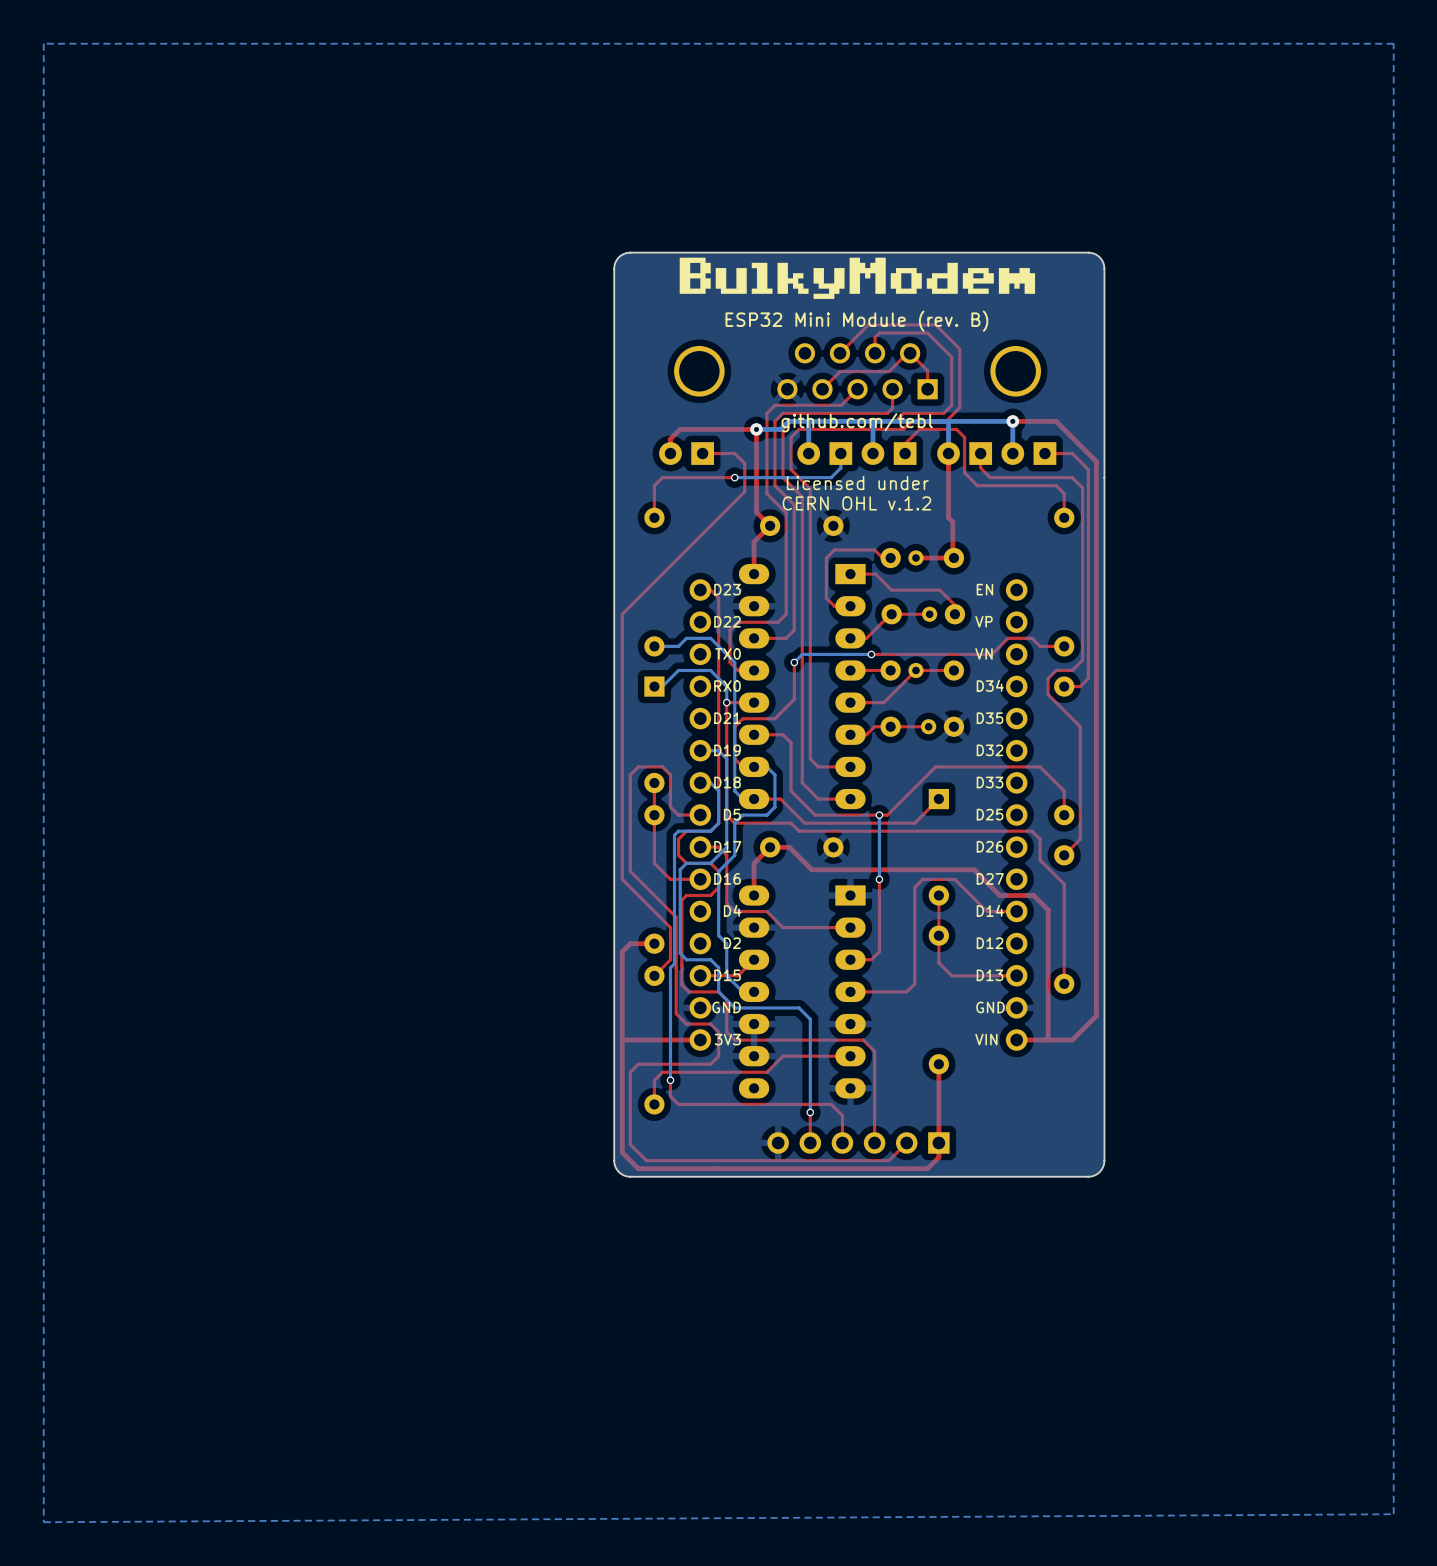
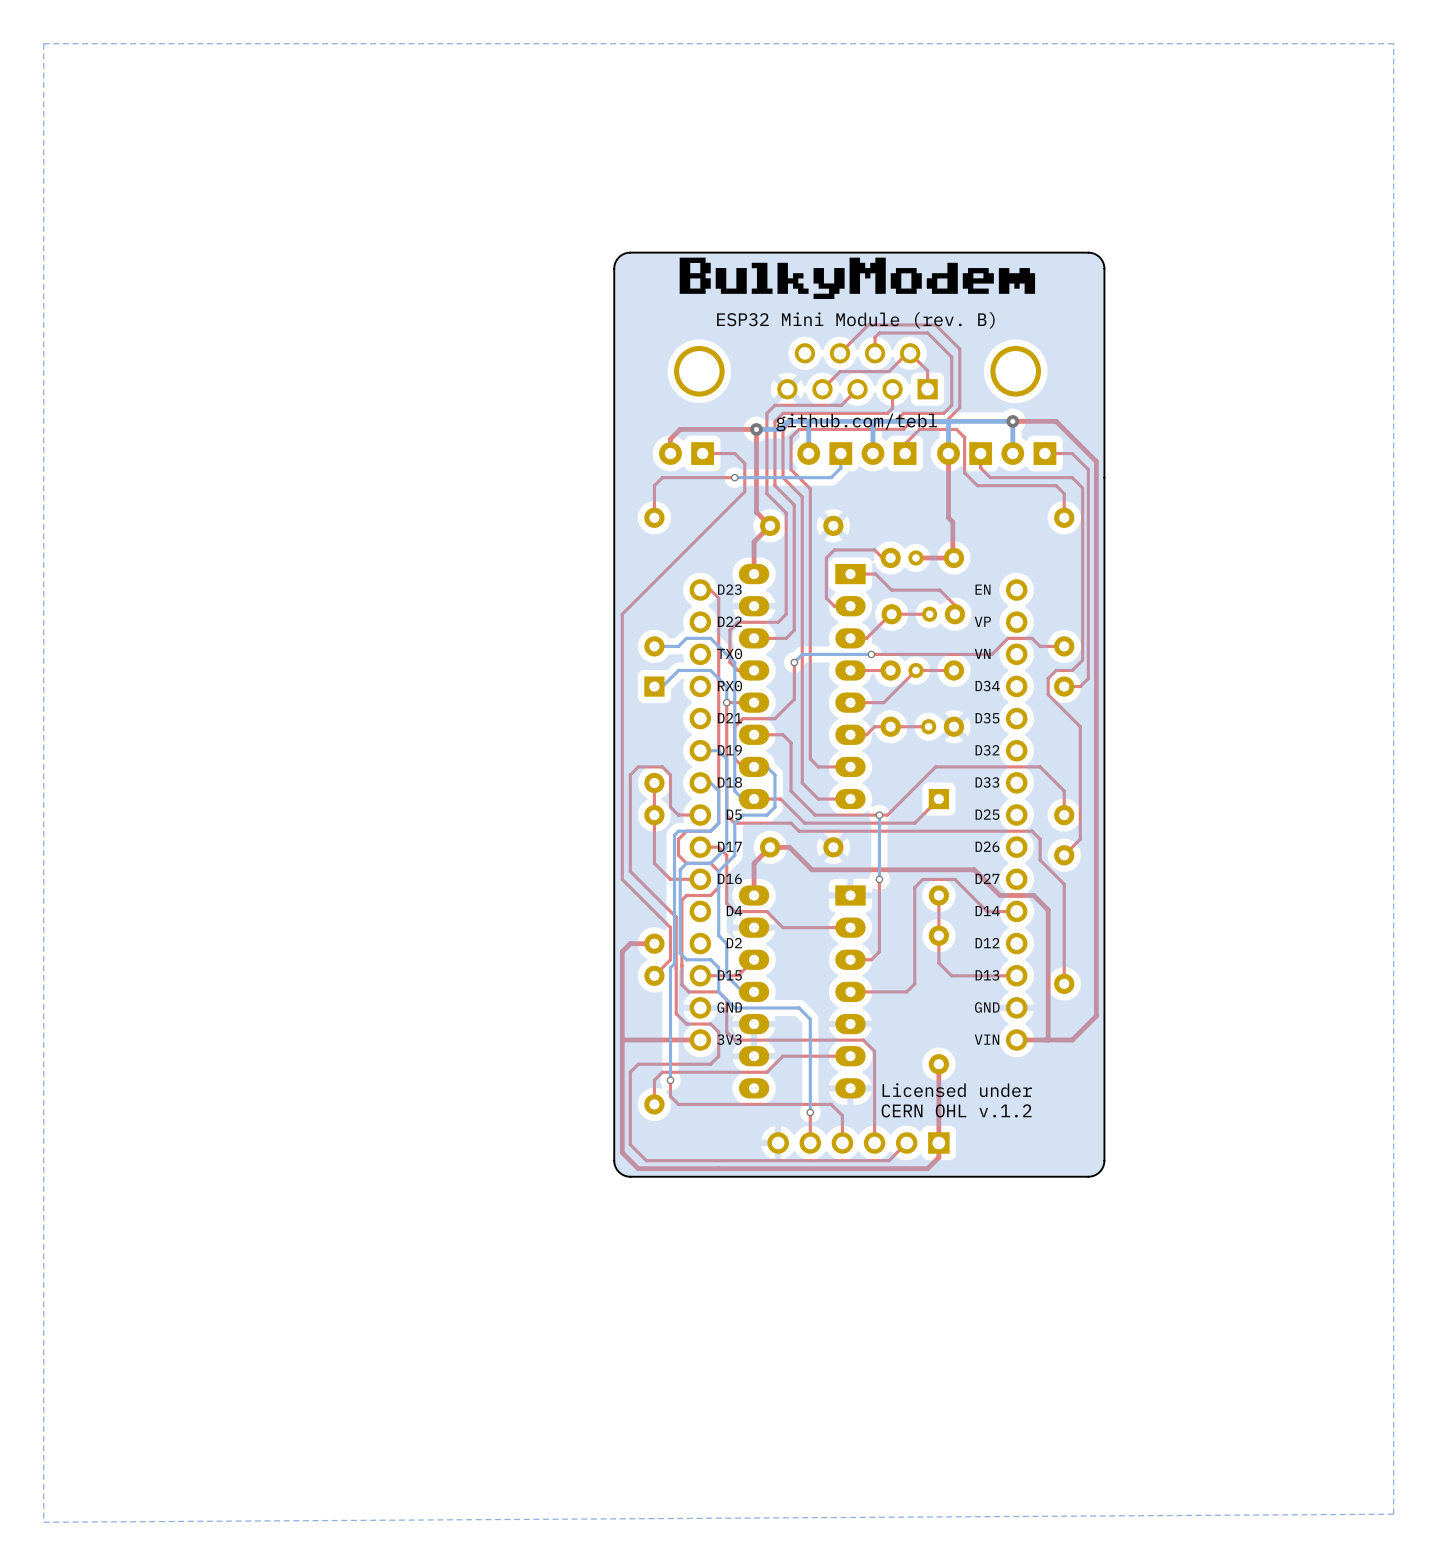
text: Licensed under (857, 483) -> none
text: CERN OHL v.1.2 (856, 503) -> none
text: none -> Licensed under (957, 1090)
text: none -> CERN OHL v.1.2 (956, 1110)

